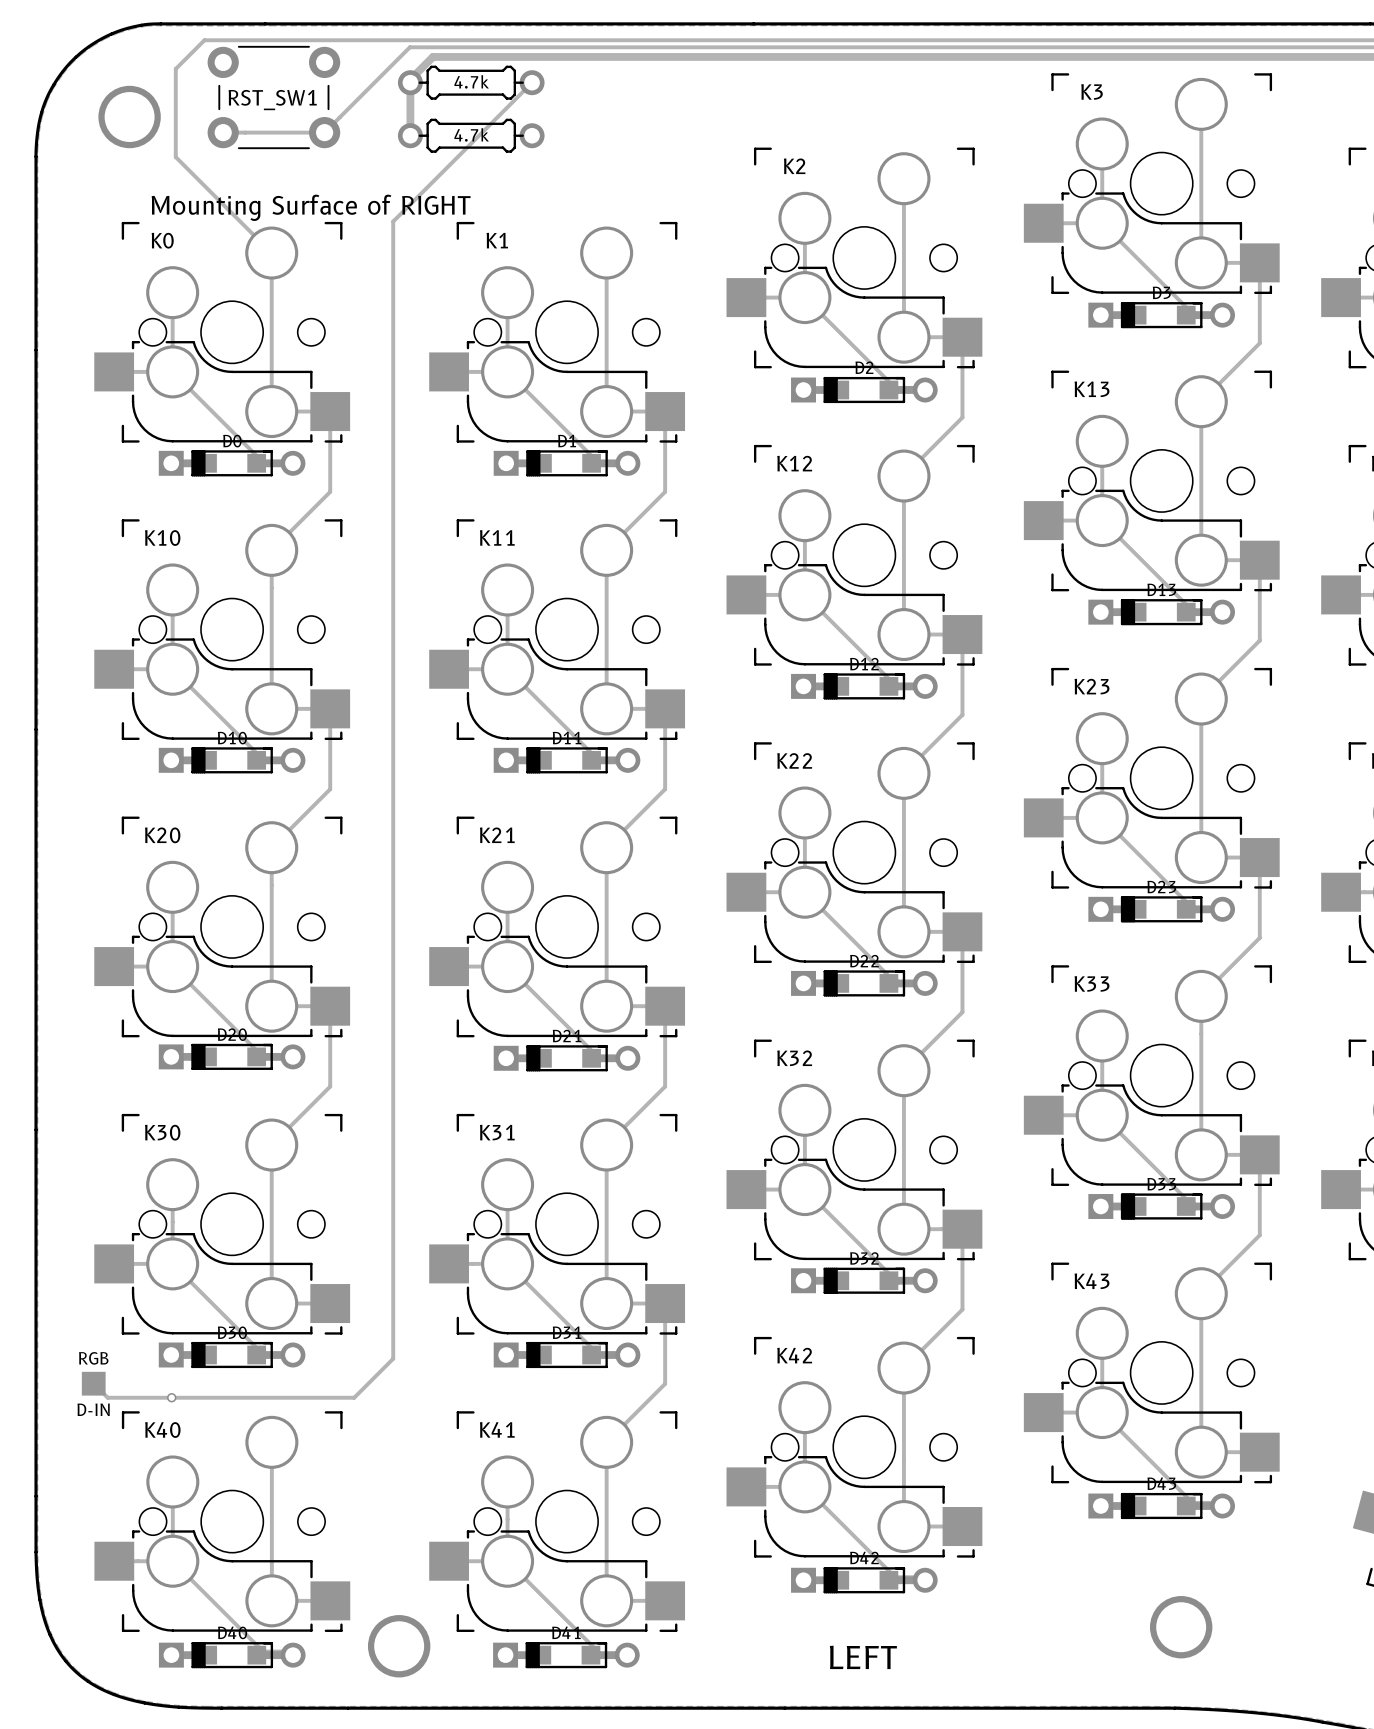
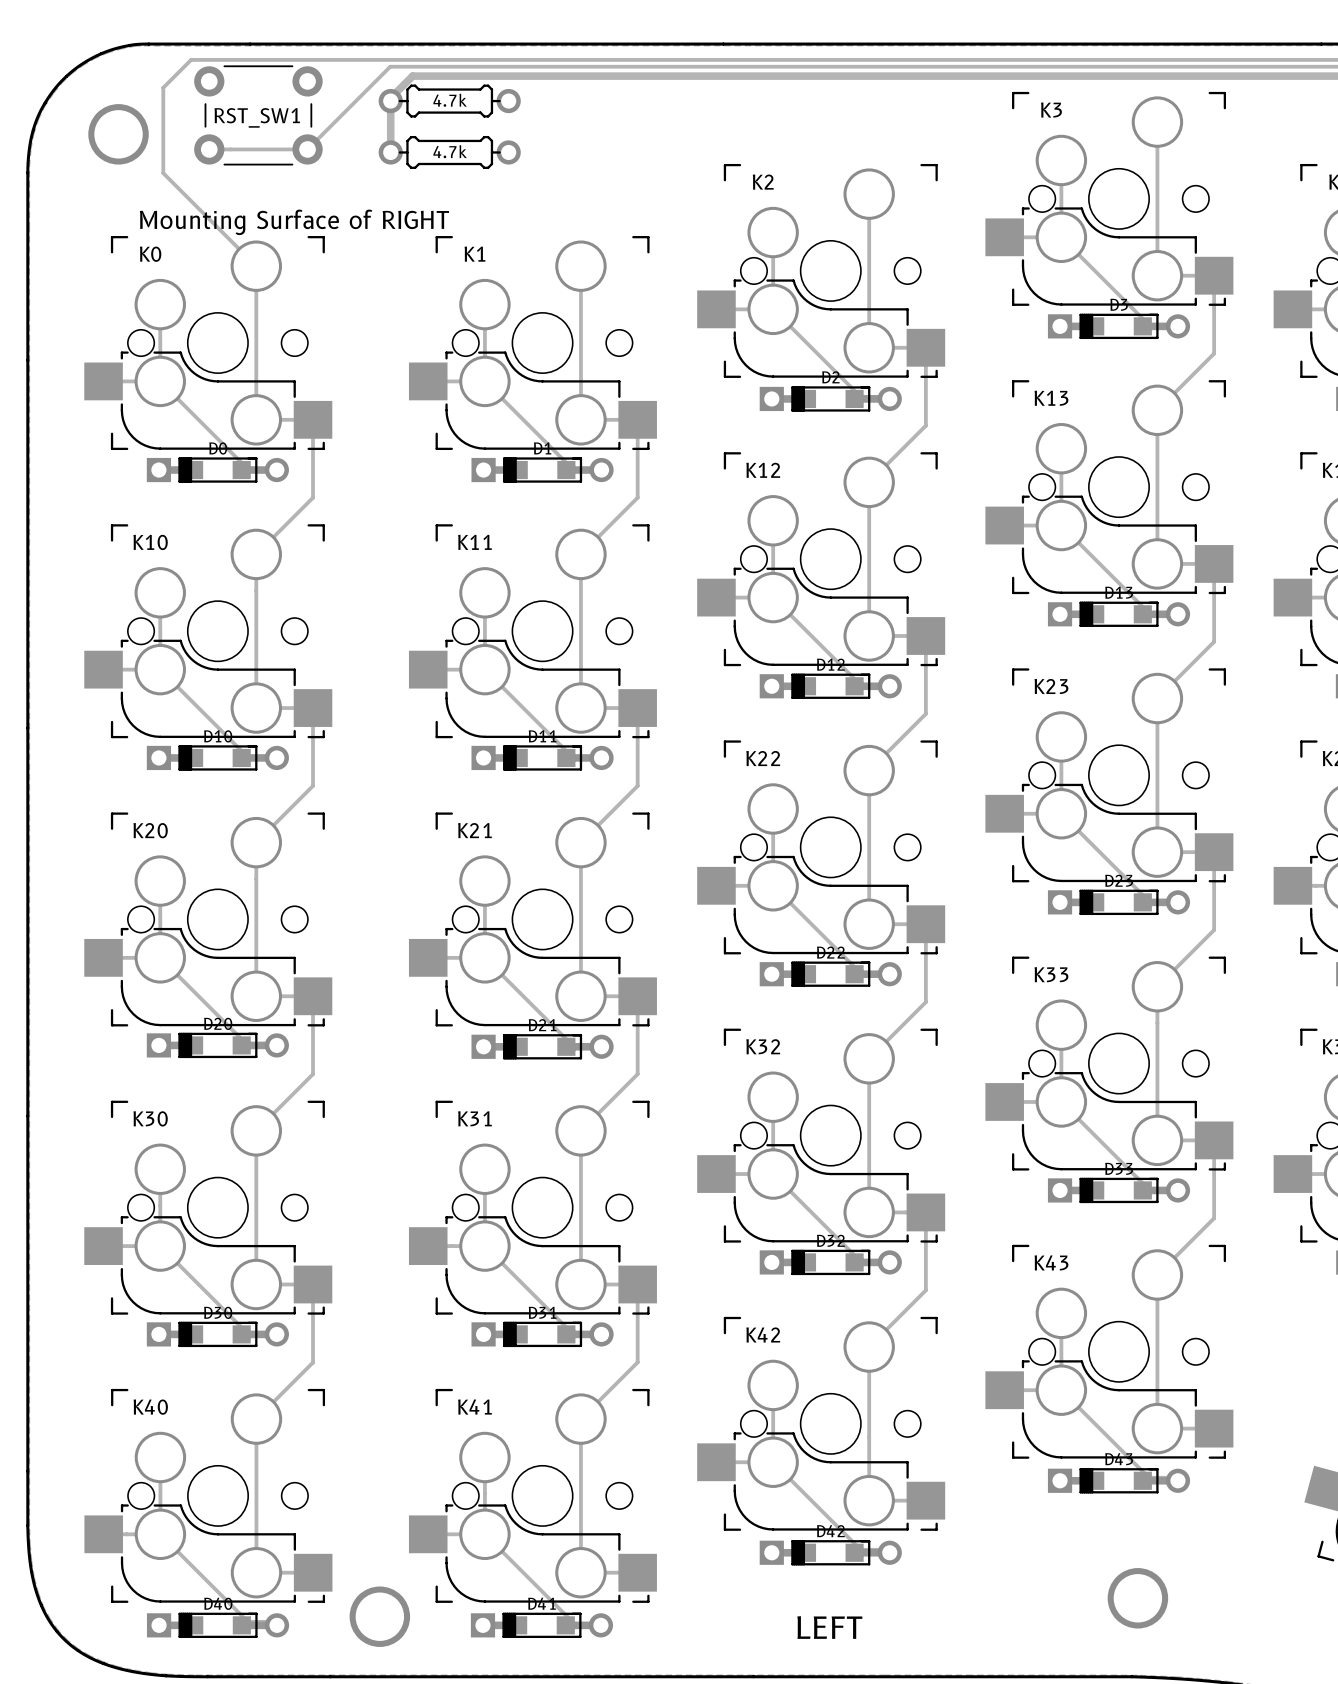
track: (532, 82) (393, 221) (393, 1358) (354, 1397) (107, 1397) (93, 1383) -> none
track: none -> (313, 1284) (313, 1362) (256, 1419)
part: RGB (93, 1383) -> none
via: (171, 1397) -> none
text: D-IN (93, 1409) -> none

